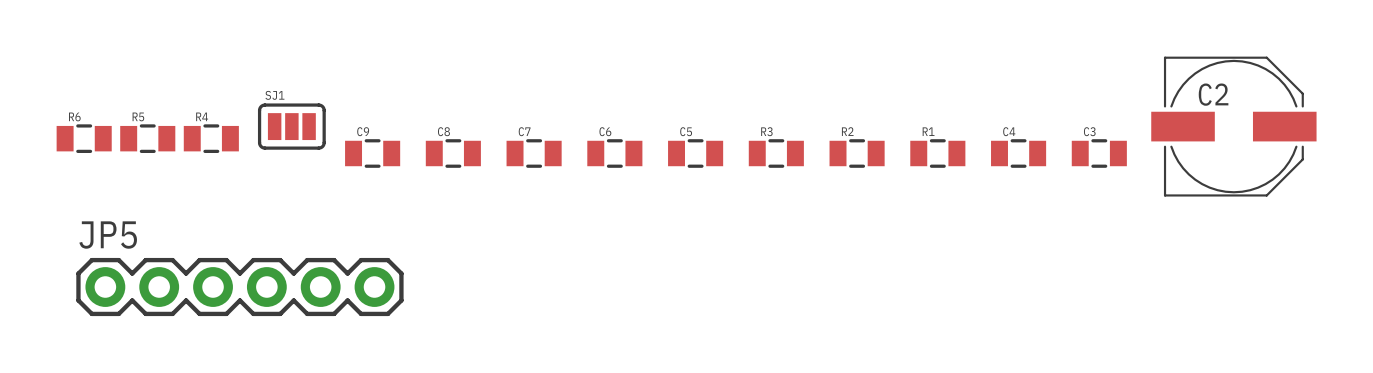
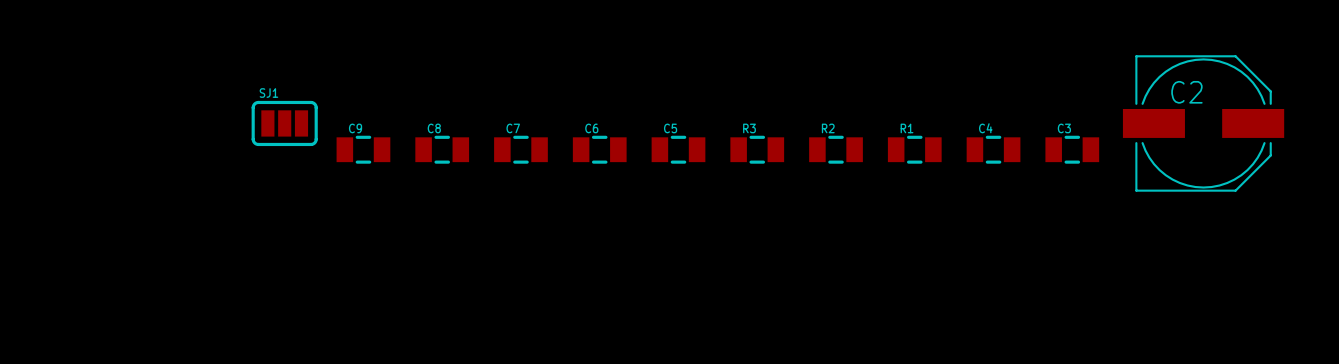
R6: (84, 138) -> none
R5: (147, 138) -> none
R4: (211, 138) -> none
JP5: (239, 287) -> none

